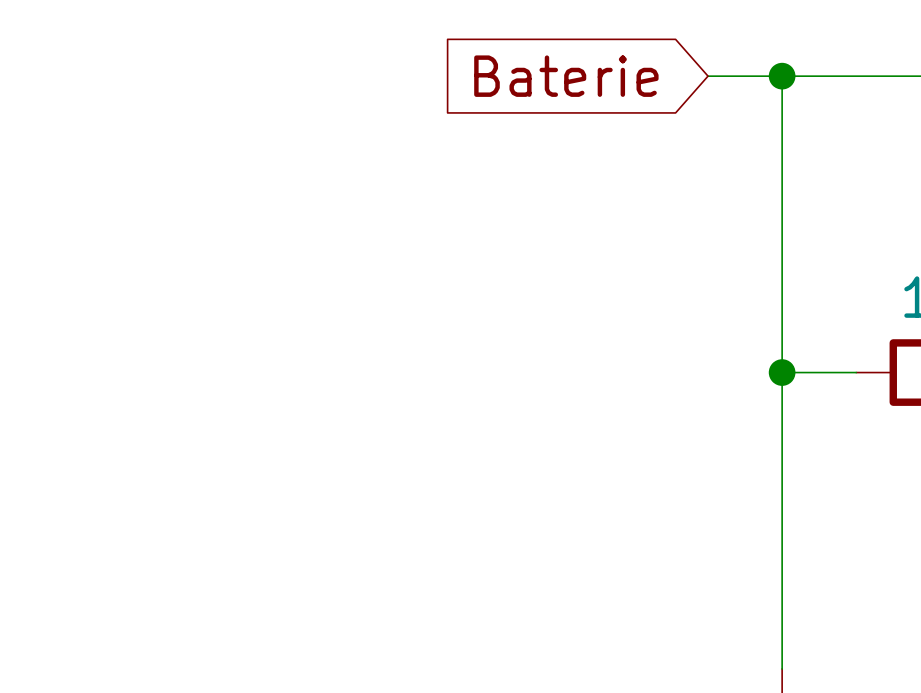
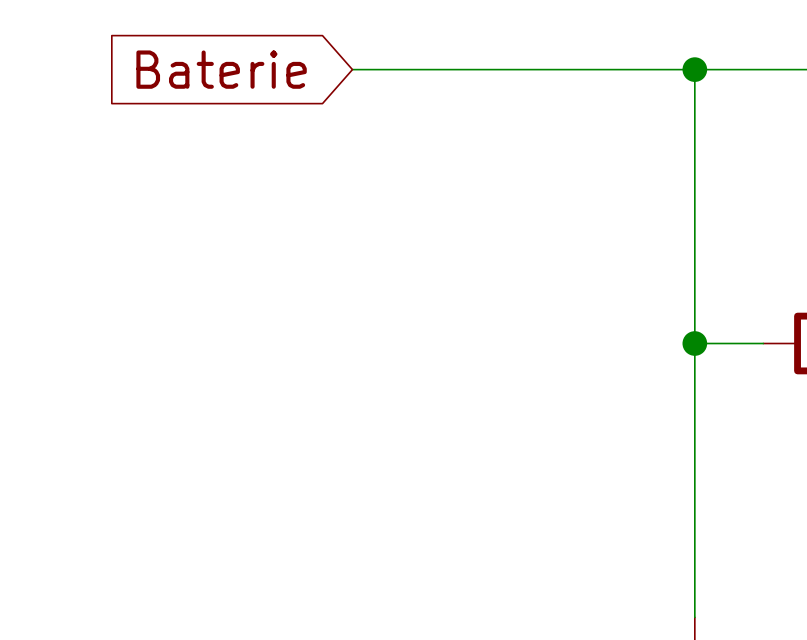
wire: none -> (352, 69) (626, 69)
global label position: Baterie (566, 76) -> Baterie (221, 69)

